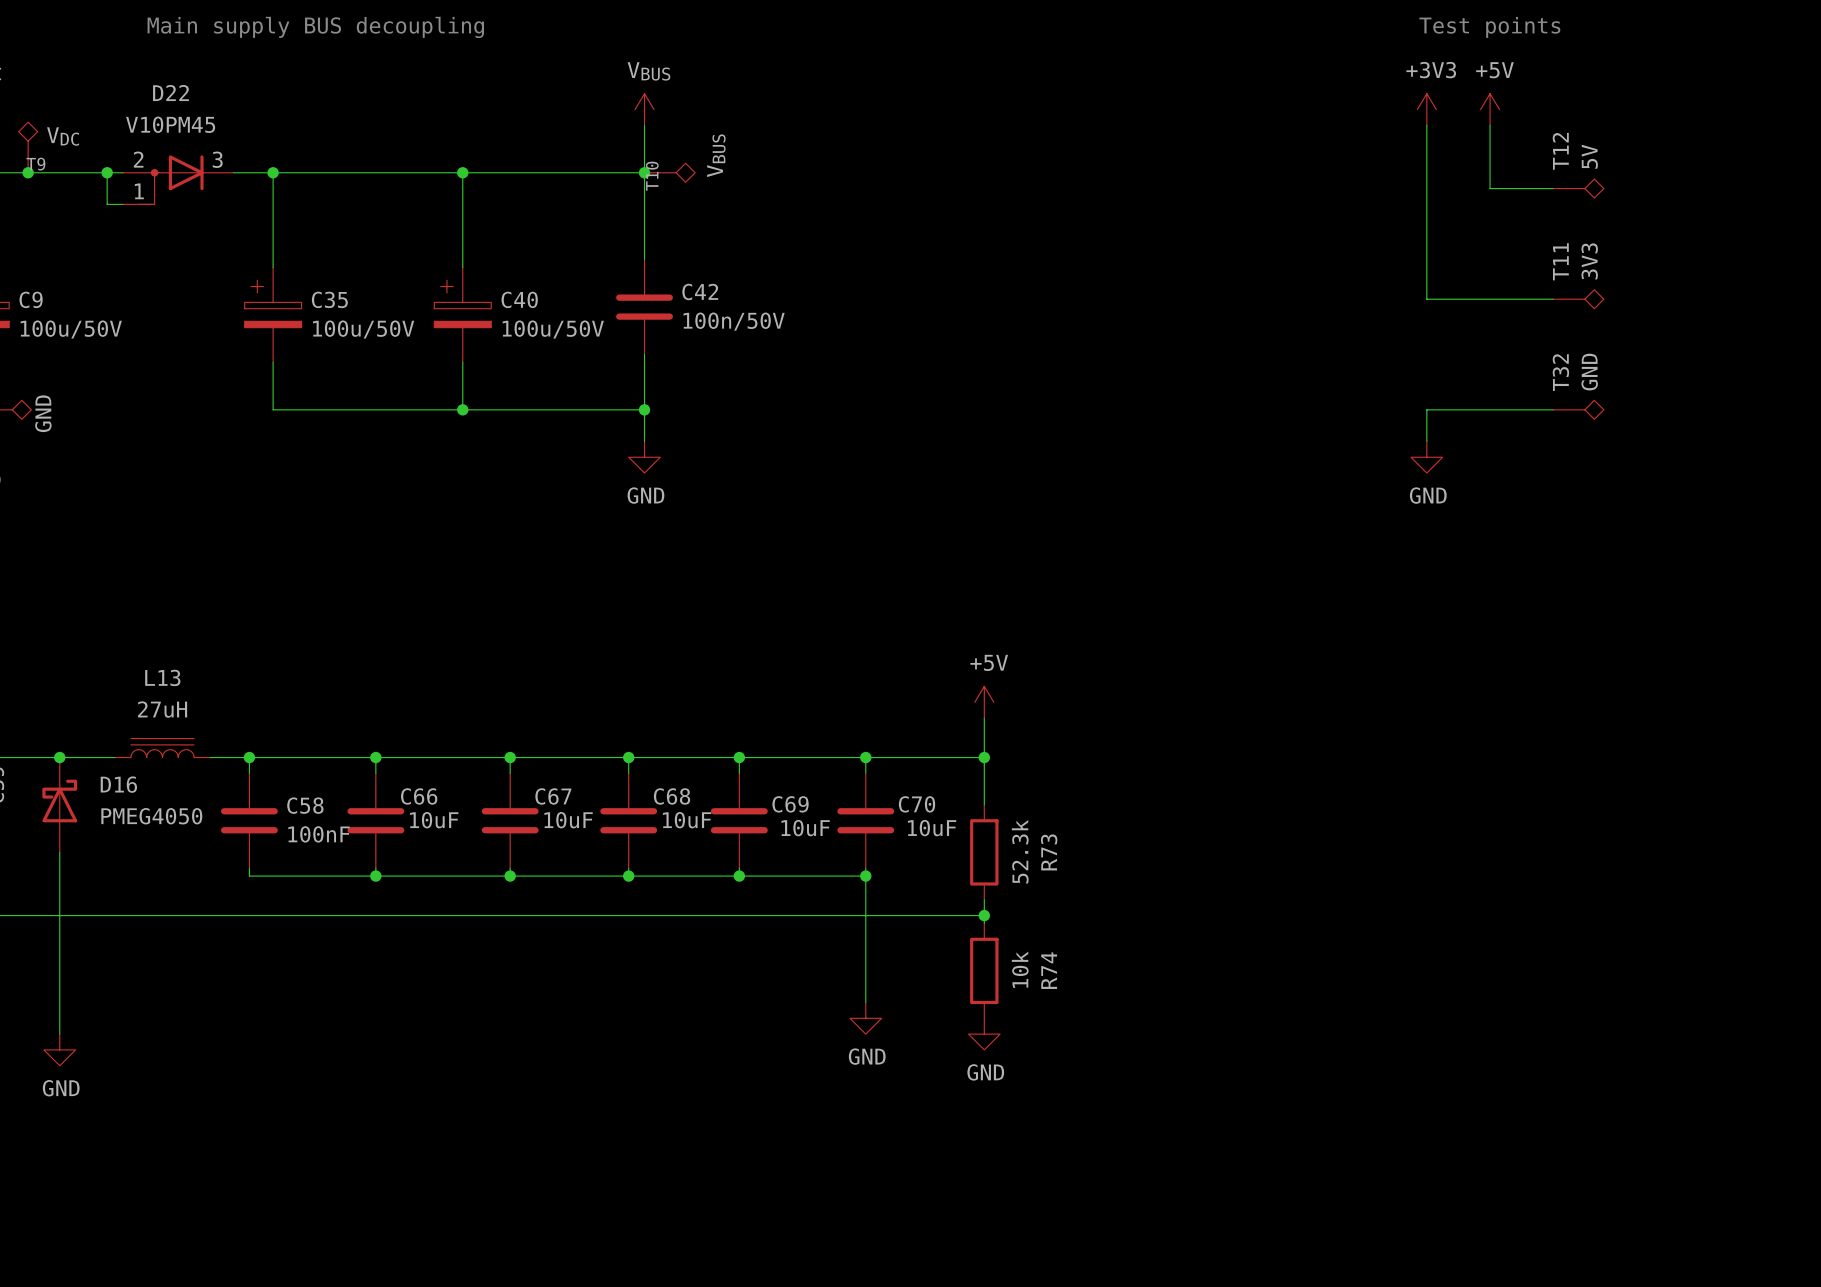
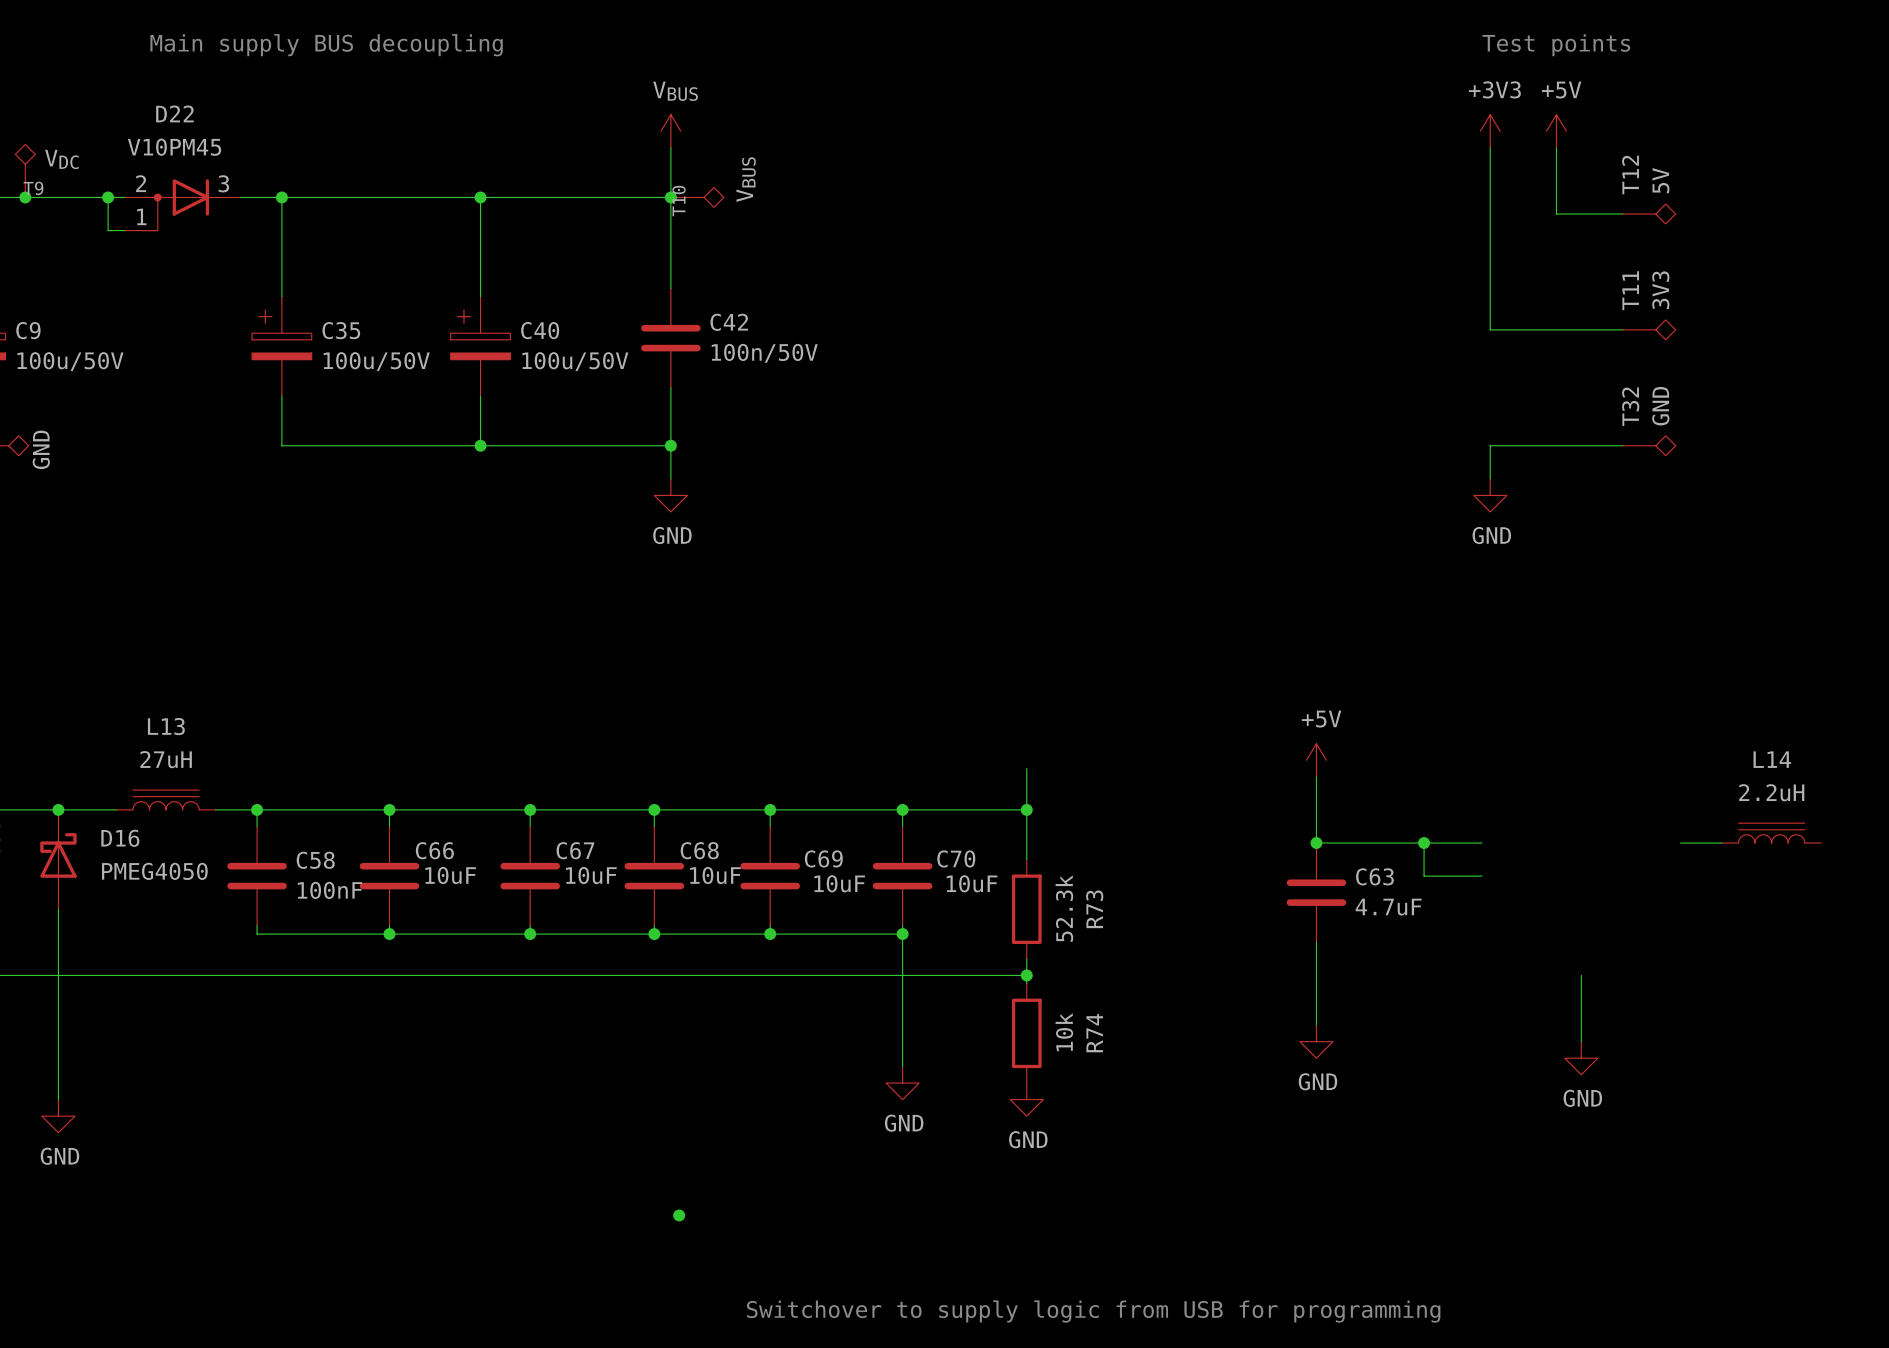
power symbol position: +5V (984, 702) -> +5V (1316, 760)
wire: none -> (1316, 776) (1316, 843) (1481, 843)
L14: none -> 2.2uH (1771, 833)
junction: none -> (1316, 843)
wire: none -> (1424, 843) (1424, 876) (1481, 876)
junction: none -> (1424, 843)
wire: none -> (1680, 843) (1722, 843)
C63: none -> 4.7uF (1316, 892)
wire: none -> (1316, 942) (1316, 1025)
wire: none -> (1581, 975) (1581, 1041)
power symbol: none -> GND (1316, 1041)
power symbol: none -> GND (1581, 1058)
junction: none -> (679, 1215)
text: none -> Switchover to supply logic from USB for programming (1093, 1311)

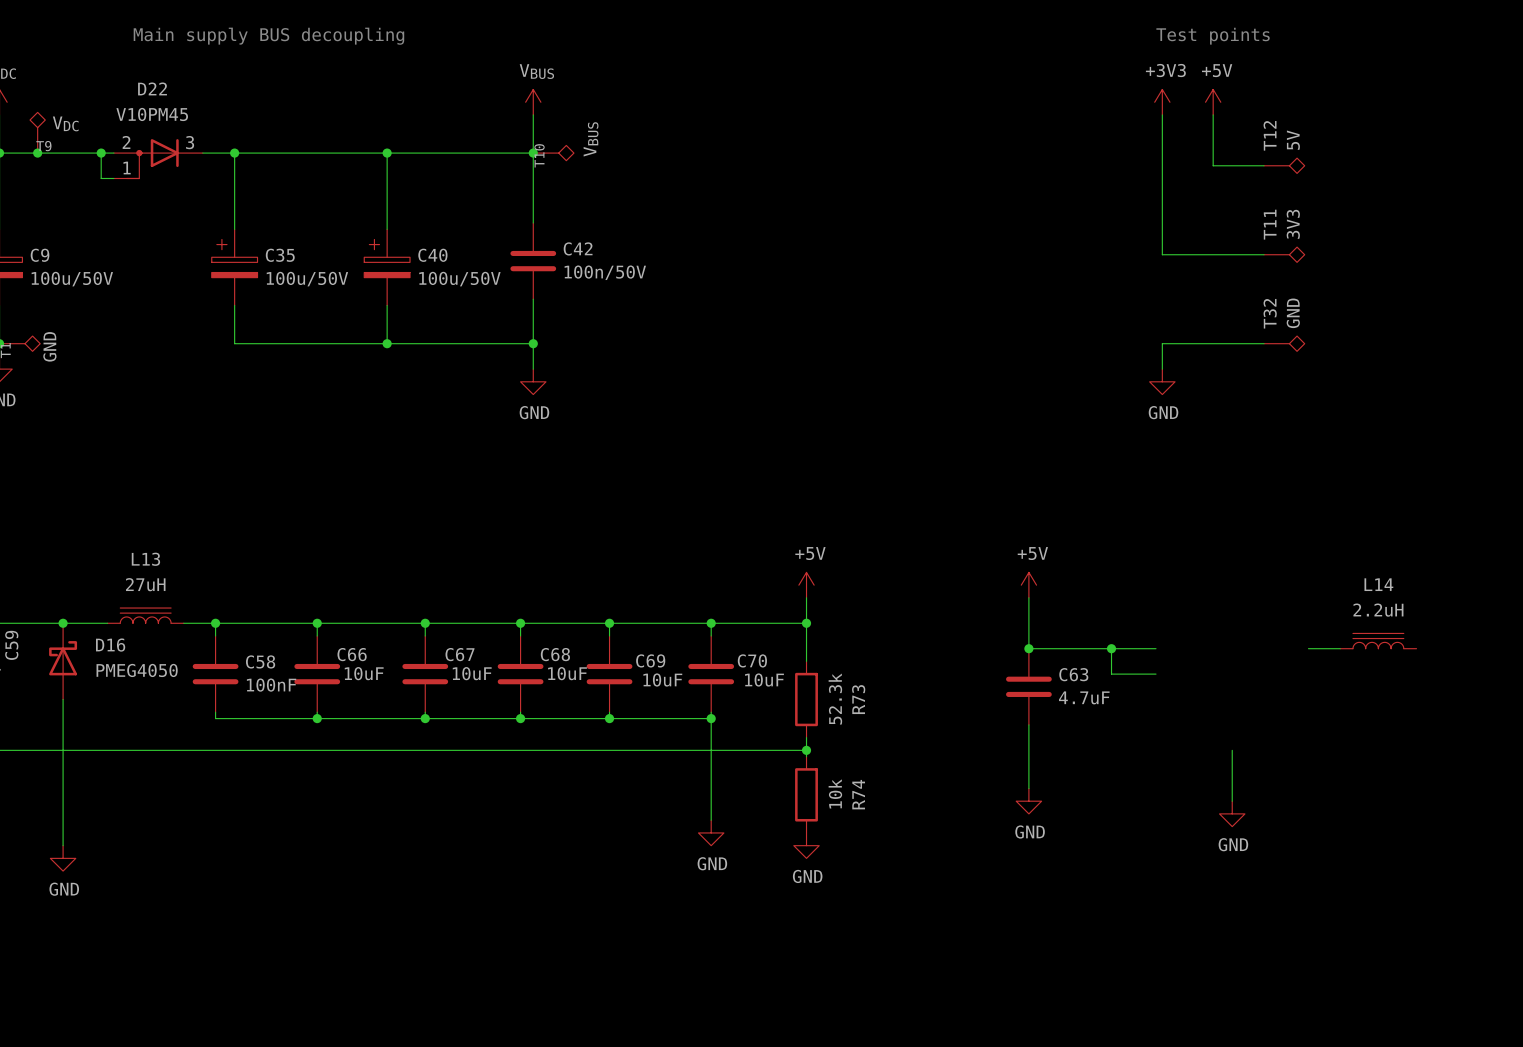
power symbol: none -> +5V (806, 585)
junction: (679, 1215) -> none
text: Switchover to supply logic from USB for programming (1093, 1311) -> none

